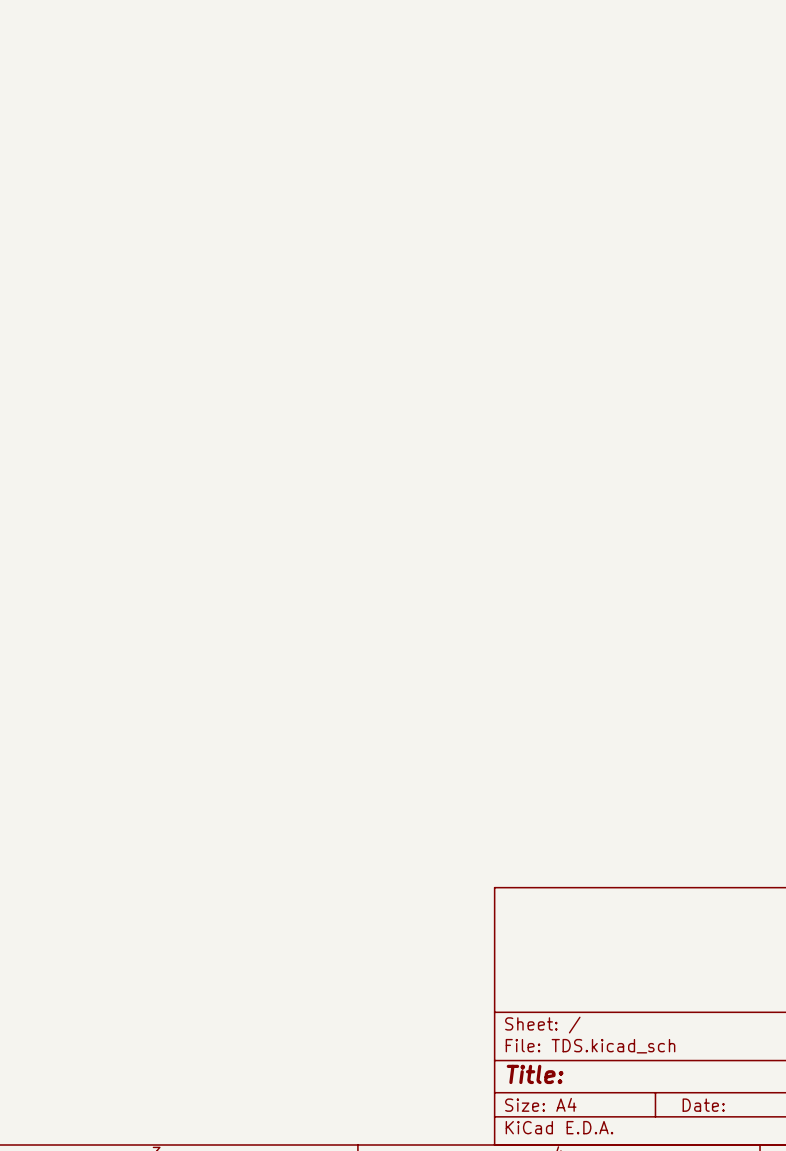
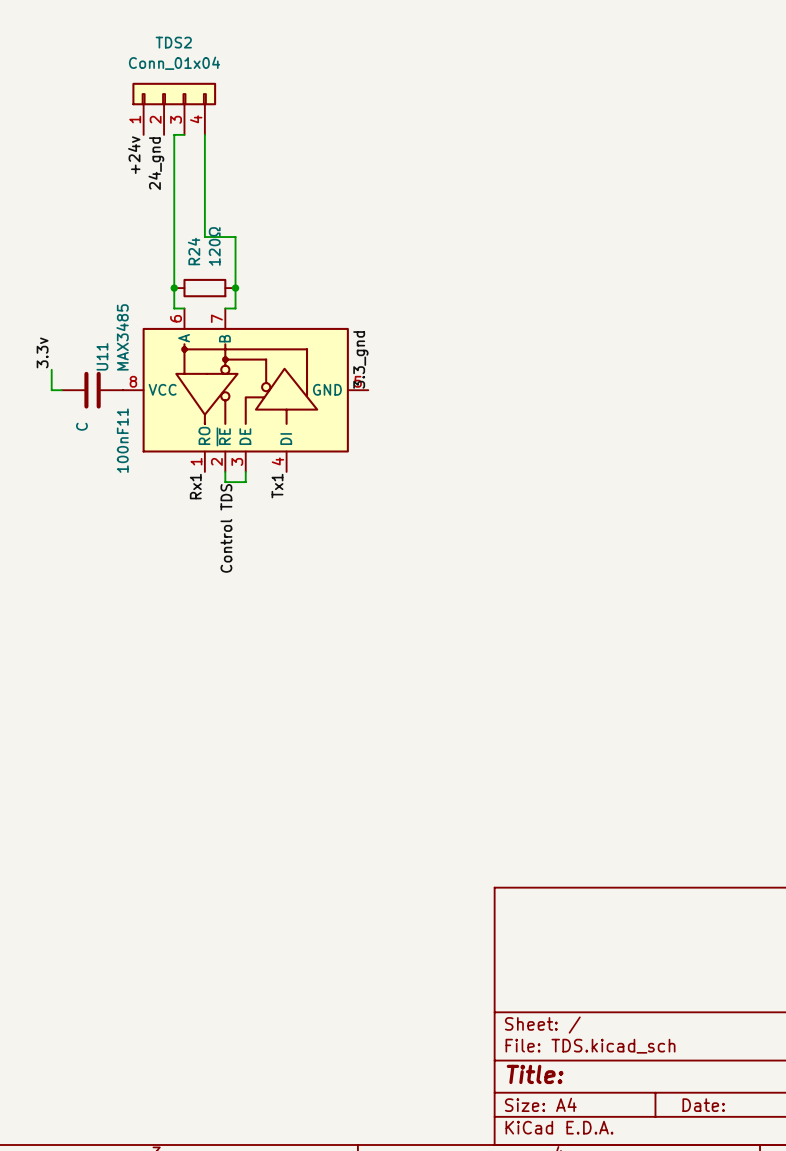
TDS2: none -> Conn_01x04 (174, 108)
wire: none -> (184, 134) (174, 134) (174, 308) (184, 308)
wire: none -> (204, 134) (204, 237) (235, 237) (235, 308) (225, 308)
label: none -> +24v (134, 155)
label: none -> 24_gnd (156, 163)
junction: none -> (174, 288)
R24: none -> 120Ω (204, 288)
junction: none -> (235, 288)
label: none -> 3.3v (42, 352)
label: none -> 3.3_gnd (360, 359)
wire: none -> (51, 369) (51, 390) (61, 390)
100nF11: none -> C (92, 390)
U11: none -> MAX3485 (245, 390)
wire: none -> (225, 471) (225, 482) (245, 482) (245, 471)
label: none -> Rx1 (195, 486)
label: none -> Tx1 (277, 486)
label: none -> Control TDS (226, 528)

